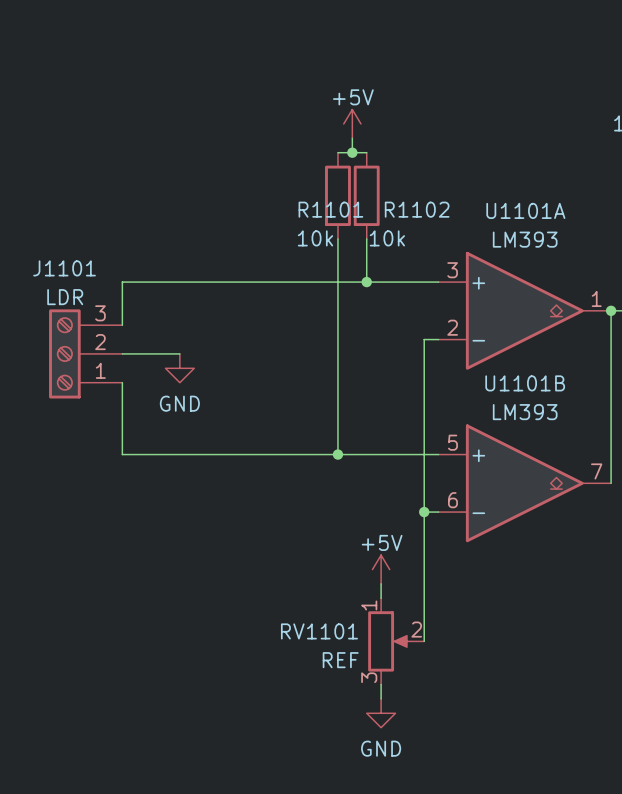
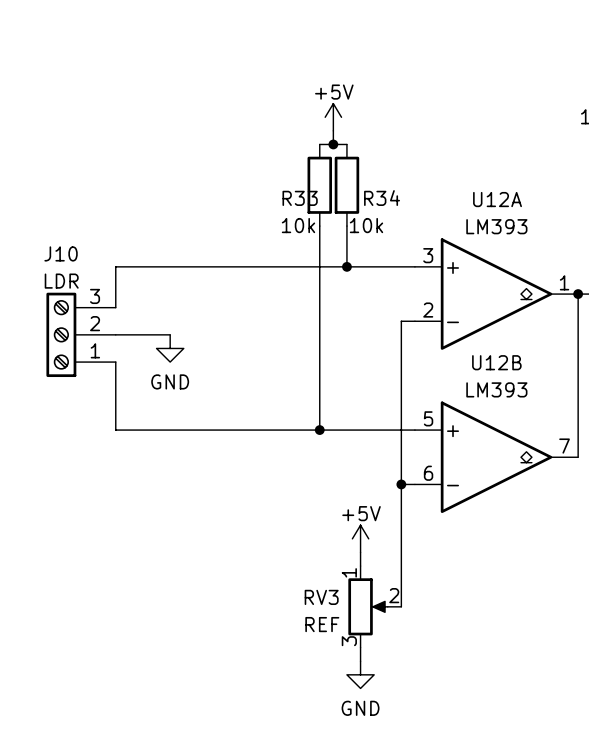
R1101 name: R1101 (330, 209) -> R33 (300, 198)
R1102 name: R1102 (417, 209) -> R34 (382, 198)
U1101A name: U1101A (525, 210) -> U12A (497, 199)
J1101 name: J1101 (64, 268) -> J10 (61, 253)
U1101B name: U1101B (525, 383) -> U12B (496, 362)
RV1101 name: RV1101 (319, 631) -> RV3 (321, 597)

